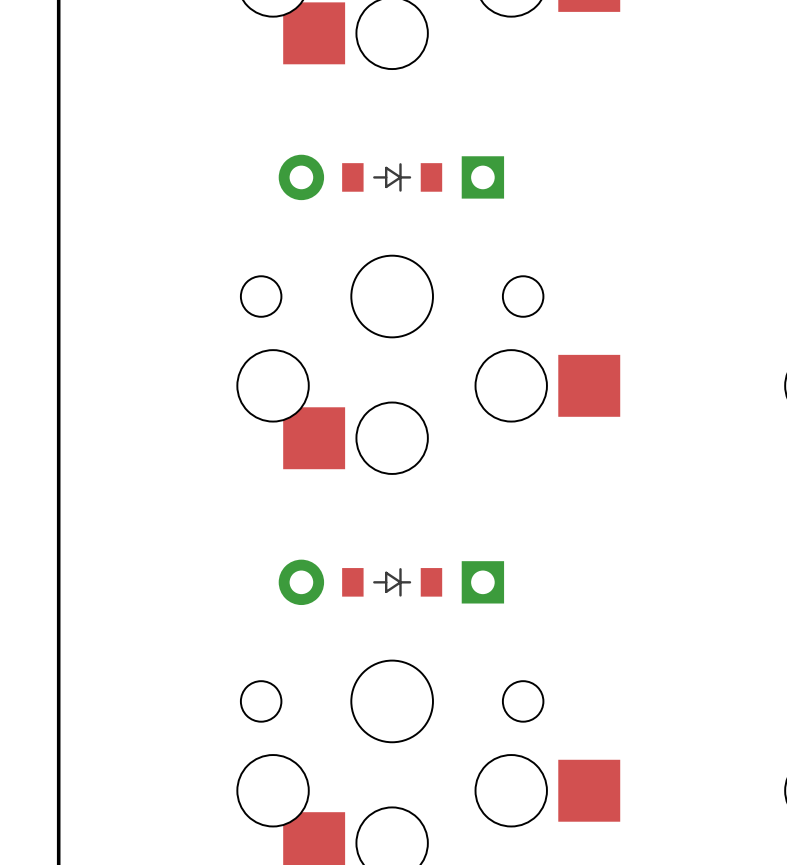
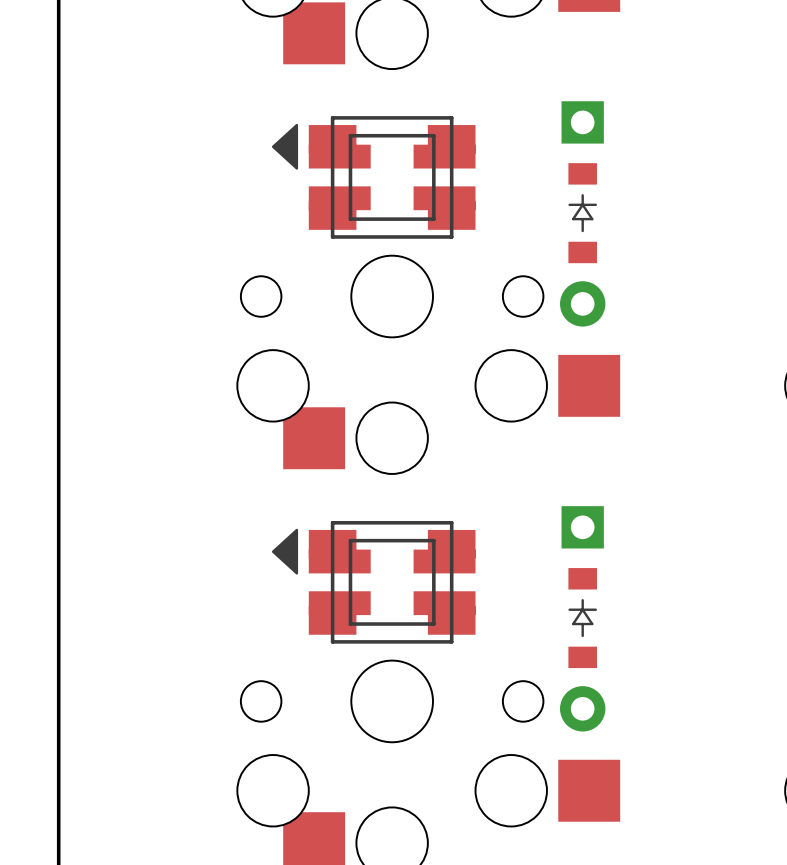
part footprint: [278, 154, 505, 201] -> [271, 116, 476, 239]
part: none -> (582, 213)
part footprint: [278, 559, 505, 606] -> [271, 521, 476, 644]
part: none -> (582, 618)

